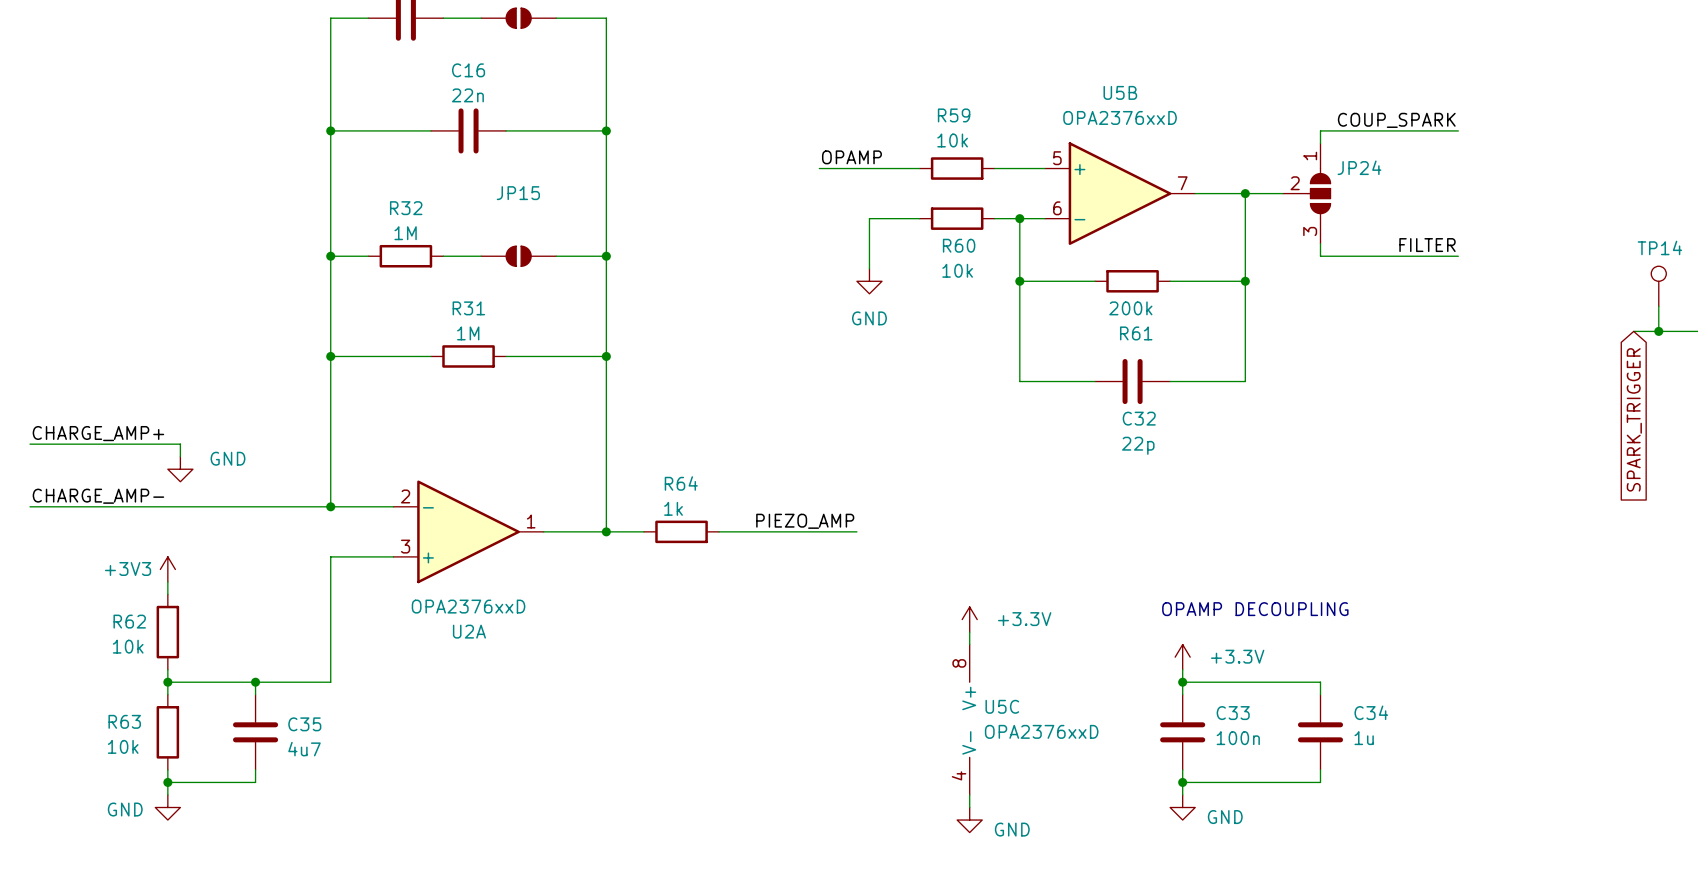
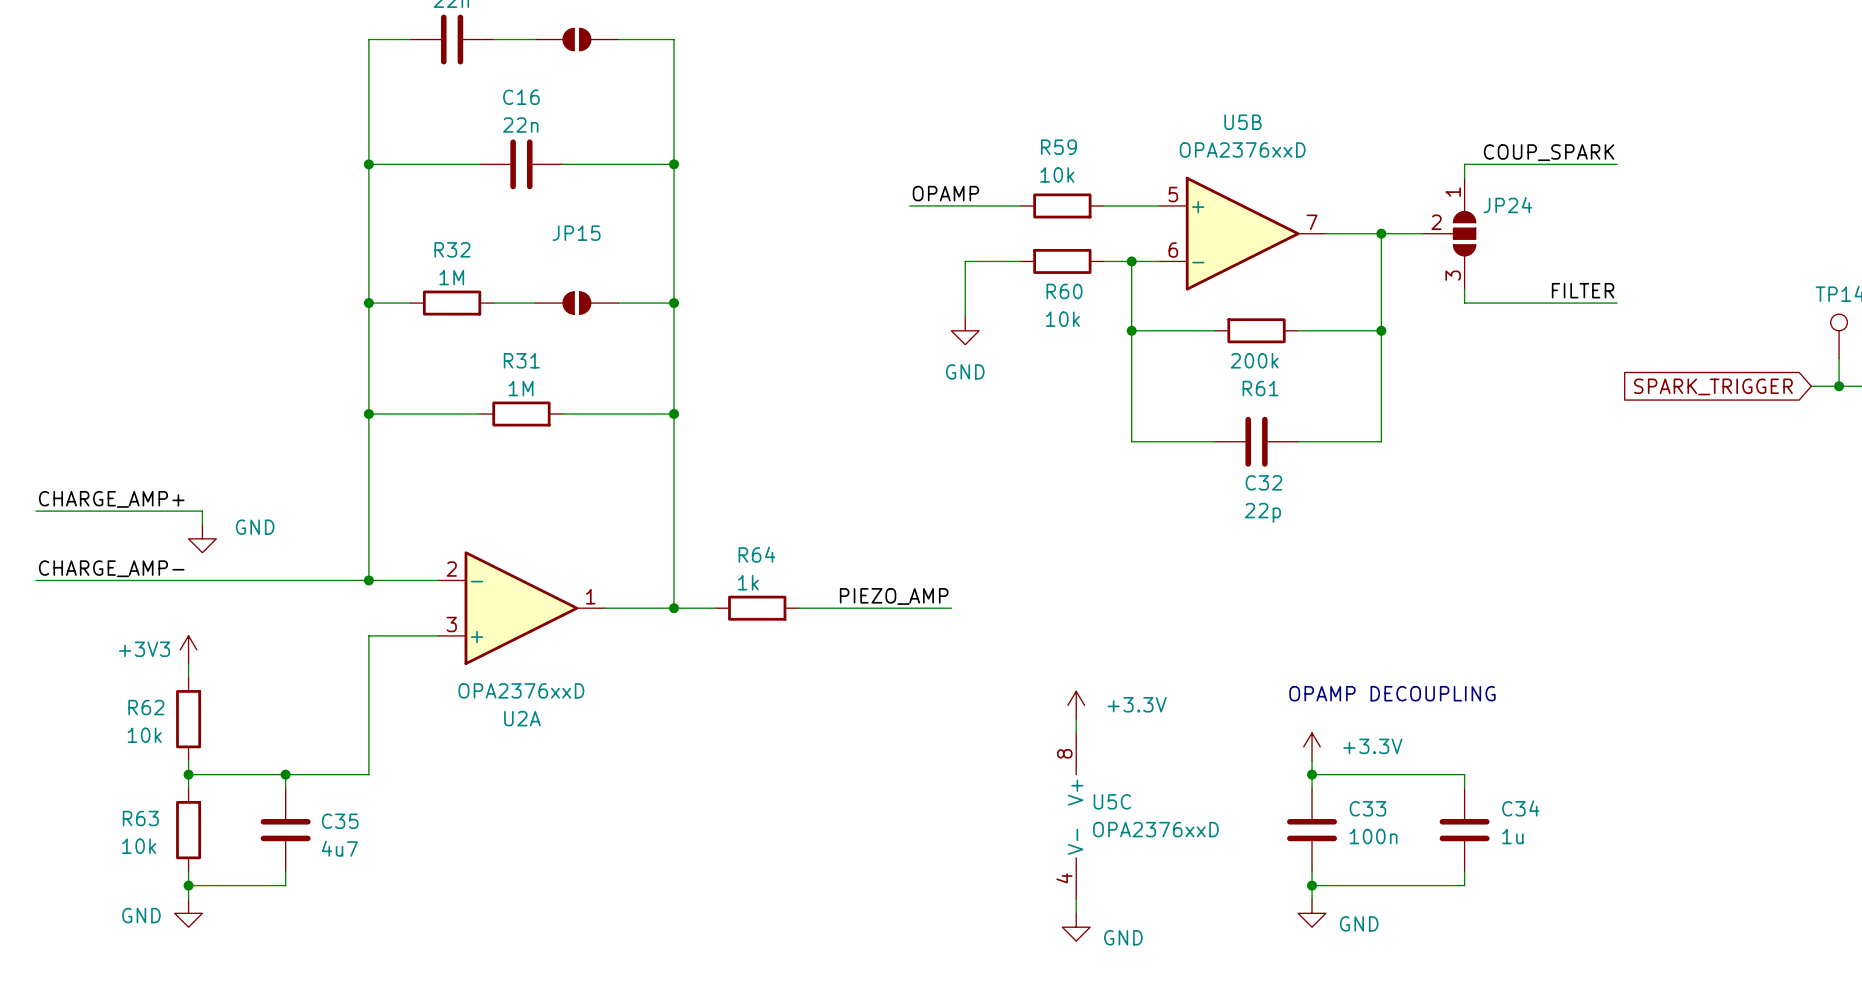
global label rotation: 0° (1634, 419) -> 90° clockwise (1713, 386)

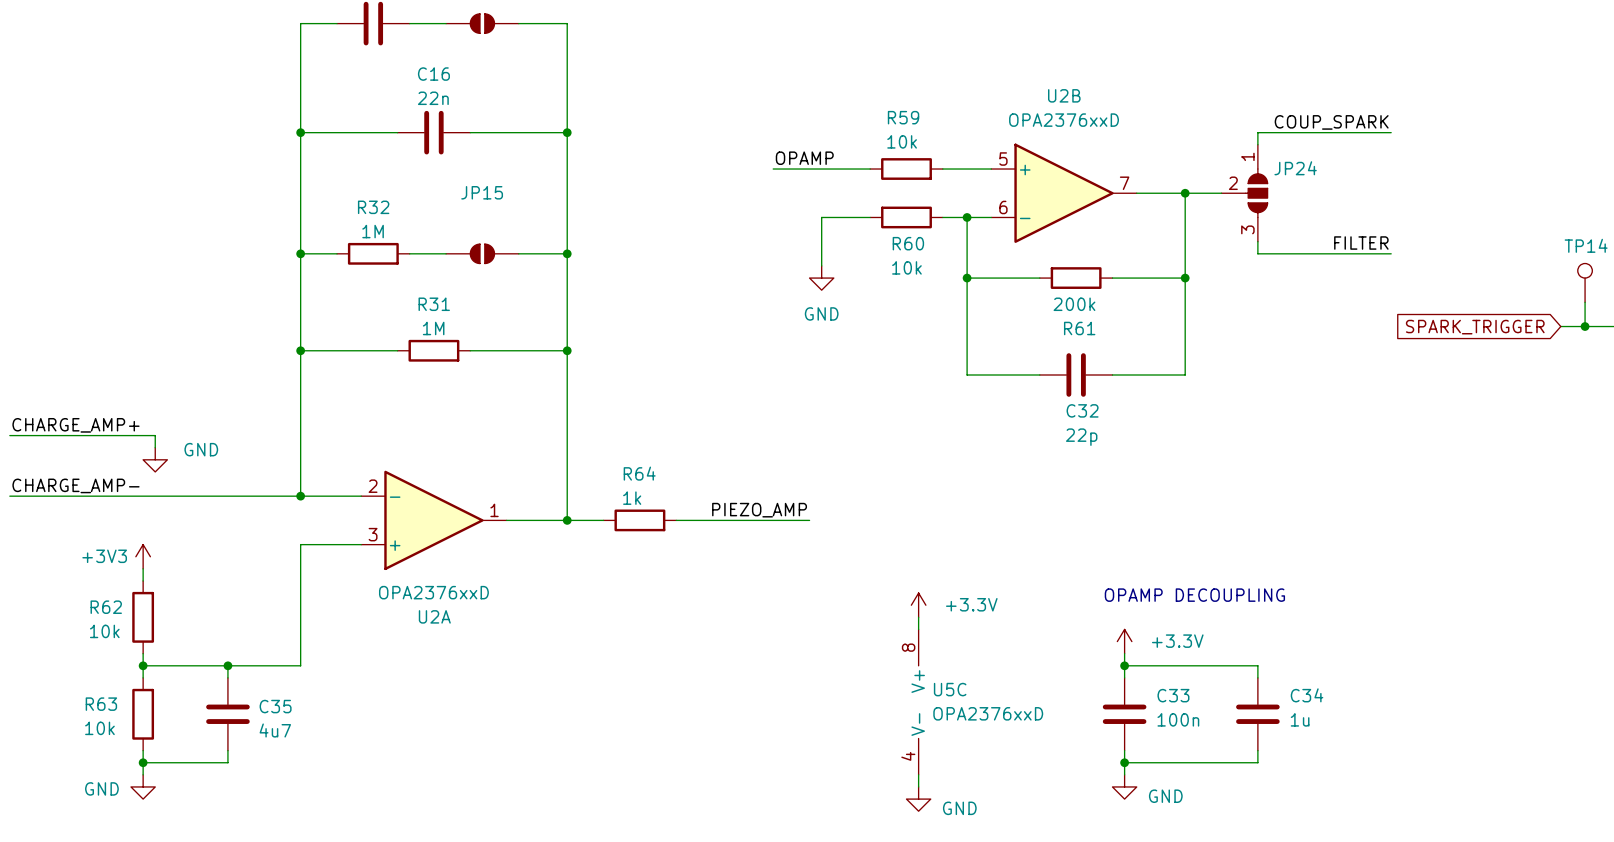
U5B name: U5B (1243, 122) -> U2B (1064, 95)

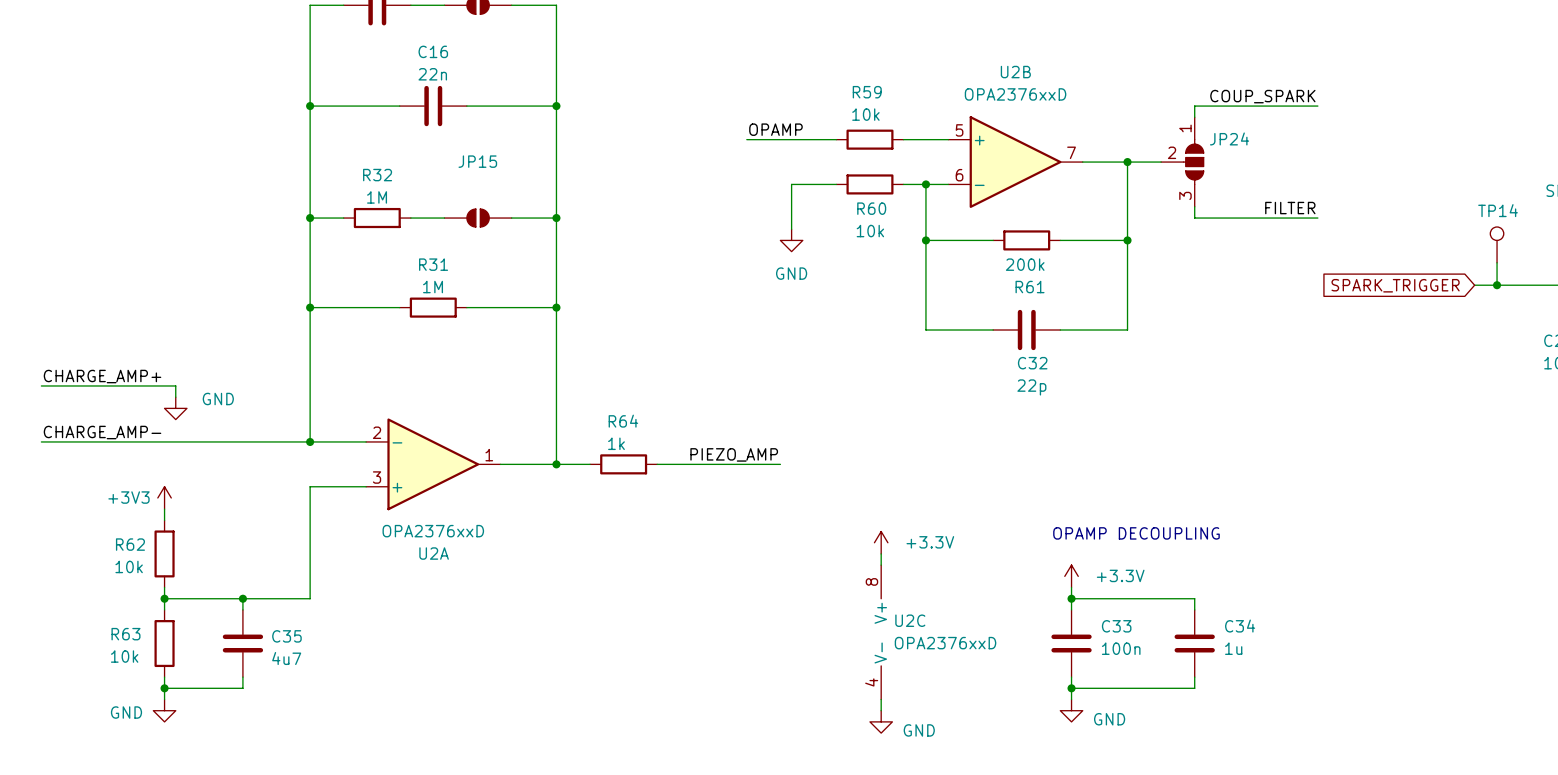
U5C name: U5C (950, 689) -> U2C (910, 620)

